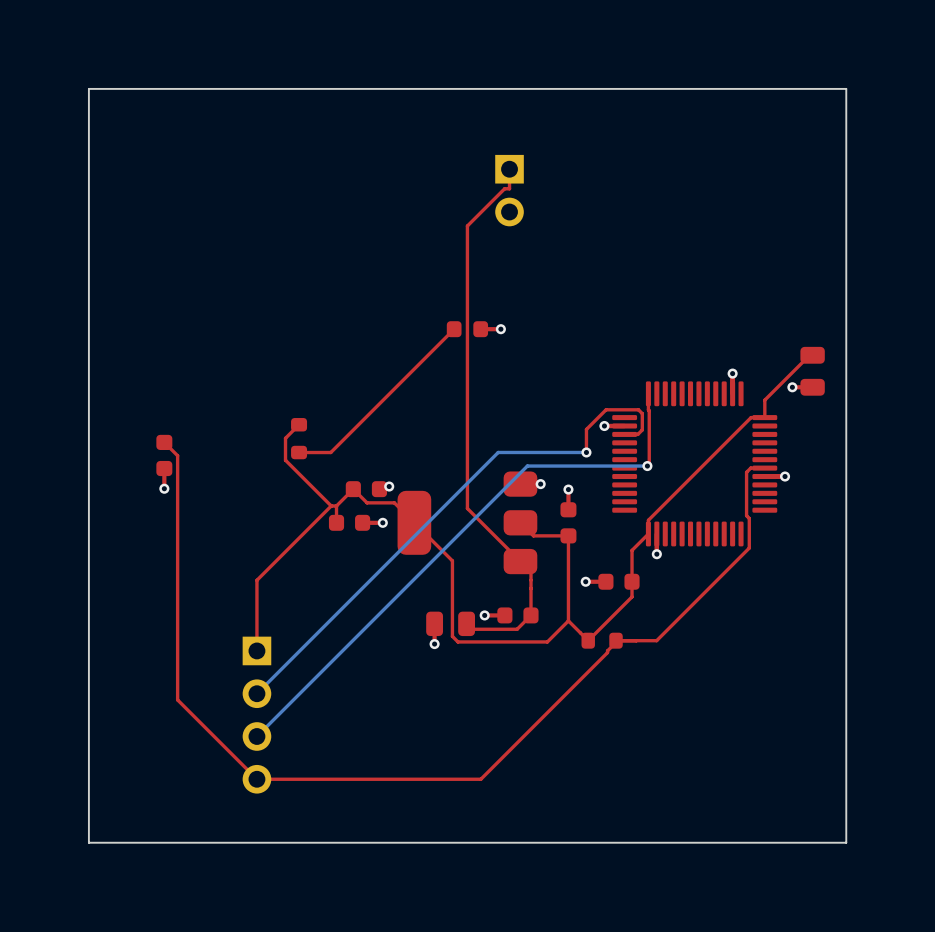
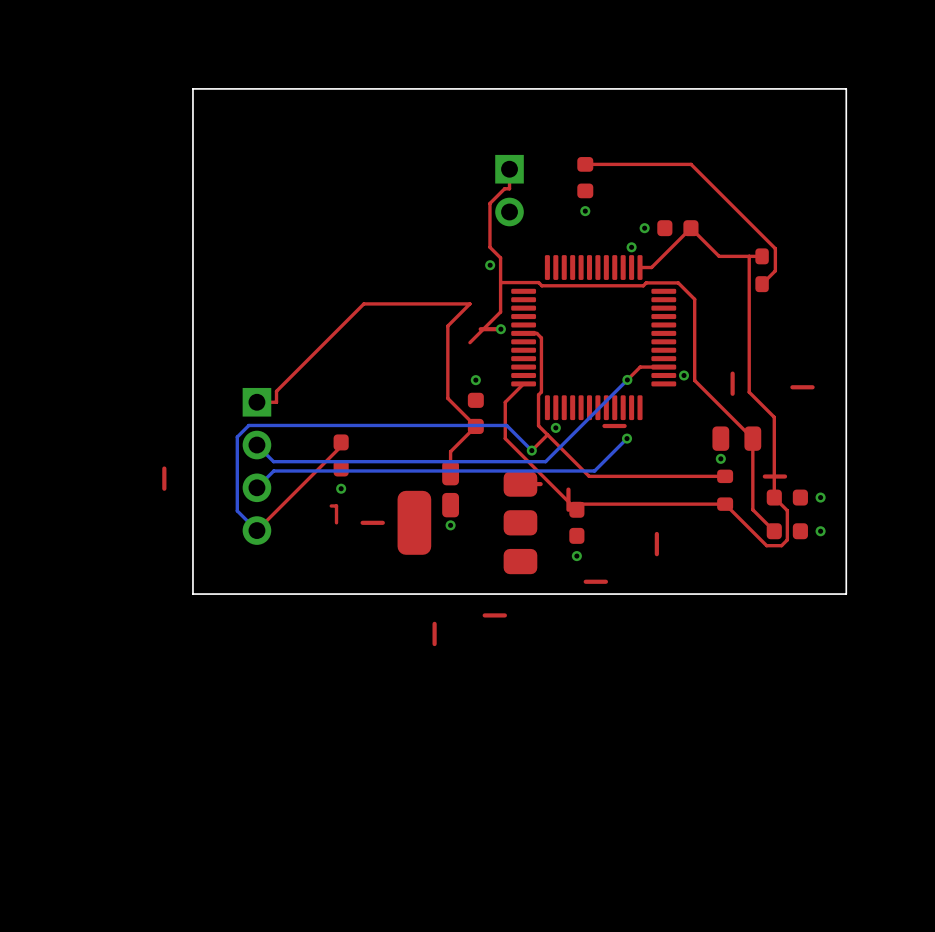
board edge: (192, 88) (88, 88) (88, 842) (846, 842) (846, 594) -> (192, 88) (192, 594) (846, 594)
top track: none -> (585, 164) (691, 164) (775, 248) (775, 270) (762, 284)
top track: (489, 203) (467, 225) (467, 508) (530, 572) (530, 615) (517, 629) (472, 629) (466, 623) -> (489, 203) (489, 247) (500, 257) (500, 312) (469, 342)
via: none -> (585, 211)
via: none -> (644, 228)
part: none -> (677, 228)
via: none -> (631, 247)
top track: none -> (749, 256) (749, 392) (774, 417) (774, 497) (787, 510) (787, 539) (781, 545) (766, 545) (725, 504) (582, 504) (576, 509) (505, 438) (505, 402) (523, 383)
top track: none -> (762, 256) (719, 256) (690, 228) (651, 267) (640, 267)
via: none -> (490, 265)
part: none -> (762, 270)
top track: none -> (500, 282) (538, 282) (541, 285) (643, 285) (646, 282) (678, 282) (694, 299) (694, 380) (752, 438) (752, 509) (774, 531)
top track: (454, 329) (330, 452) (299, 452) -> none
part rotation: 0° (467, 329) -> 90° clockwise (585, 177)
part position: (467, 329) -> (585, 177)
top track: none -> (523, 333) (536, 333) (541, 337) (541, 392) (538, 394) (538, 425) (589, 476) (725, 476)
top track: (812, 355) (809, 355) (764, 400) (764, 417) (751, 417) (648, 520) (648, 533) (632, 550) (632, 596) (588, 640) (568, 620) -> none
top track: none -> (663, 367) (640, 367) (627, 379)
part rotation: 0° (812, 371) -> 90° clockwise (736, 438)
part position: (812, 371) -> (736, 438)
via: (732, 373) -> none
via: none -> (684, 375)
bottom track: none -> (627, 379) (545, 461) (273, 461) (256, 445)
via: none -> (627, 379)
via: none -> (475, 380)
via: (792, 387) -> none
top track: (648, 393) (649, 464) (647, 466) -> none
top track: none -> (256, 402) (276, 402) (276, 391) (363, 303) (469, 303) (447, 326) (447, 398) (475, 426) (450, 451) (450, 473)
part: none -> (475, 413)
top track: (299, 424) (285, 438) (285, 460) (331, 505) (256, 580) (256, 650) -> none
via: (604, 426) -> none
via: none -> (555, 427)
top track: none -> (547, 434) (531, 450)
top track: (624, 434) (637, 434) (642, 429) (642, 413) (638, 409) (606, 409) (586, 429) (586, 452) -> none
part: (299, 438) -> none
bottom track: none -> (627, 438) (594, 470) (273, 470) (256, 487)
via: none -> (627, 438)
top track: (164, 442) (177, 455) (177, 699) (256, 779) (480, 779) (617, 640) -> none
top track: none -> (341, 442) (341, 446) (256, 530)
bottom track: none -> (531, 450) (506, 425) (248, 425) (237, 437) (237, 510) (256, 530)
via: none -> (531, 450)
bottom track: (586, 452) (498, 452) (256, 693) -> none
via: (586, 452) -> none
part: (164, 455) -> none
part: none -> (341, 455)
via: none -> (720, 458)
part position: (694, 463) -> (593, 337)
bottom track: (647, 466) (527, 466) (256, 736) -> none
via: (647, 466) -> none
top track: (764, 468) (750, 468) (746, 472) (746, 515) (749, 518) (749, 548) (656, 640) (616, 640) -> none
via: (785, 476) -> none
via: (540, 484) -> none
via: (389, 486) -> none
via: (164, 488) -> none
via: none -> (341, 488)
part: (366, 489) -> none
part: none -> (450, 489)
via: (568, 489) -> none
part: none -> (787, 497)
via: none -> (820, 497)
part footprint: [560, 502, 577, 544] -> [569, 501, 585, 544]
top track: (336, 505) (353, 489) (367, 502) (394, 502) (452, 560) (452, 636) (457, 641) (547, 641) (568, 620) -> none
part: (349, 522) -> none
via: (382, 522) -> none
top track: (520, 522) (533, 535) (568, 535) (568, 620) -> none
via: none -> (450, 525)
part: none -> (787, 531)
via: none -> (820, 531)
via: (656, 554) -> none
via position: (585, 581) -> (576, 556)
part: (618, 581) -> none
via: (484, 615) -> none
part: (517, 615) -> none
part: (450, 623) -> none
part rotation: 0° (602, 640) -> 90° clockwise (725, 490)
part position: (602, 640) -> (725, 490)
via: (434, 644) -> none
part position: (256, 715) -> (256, 466)

